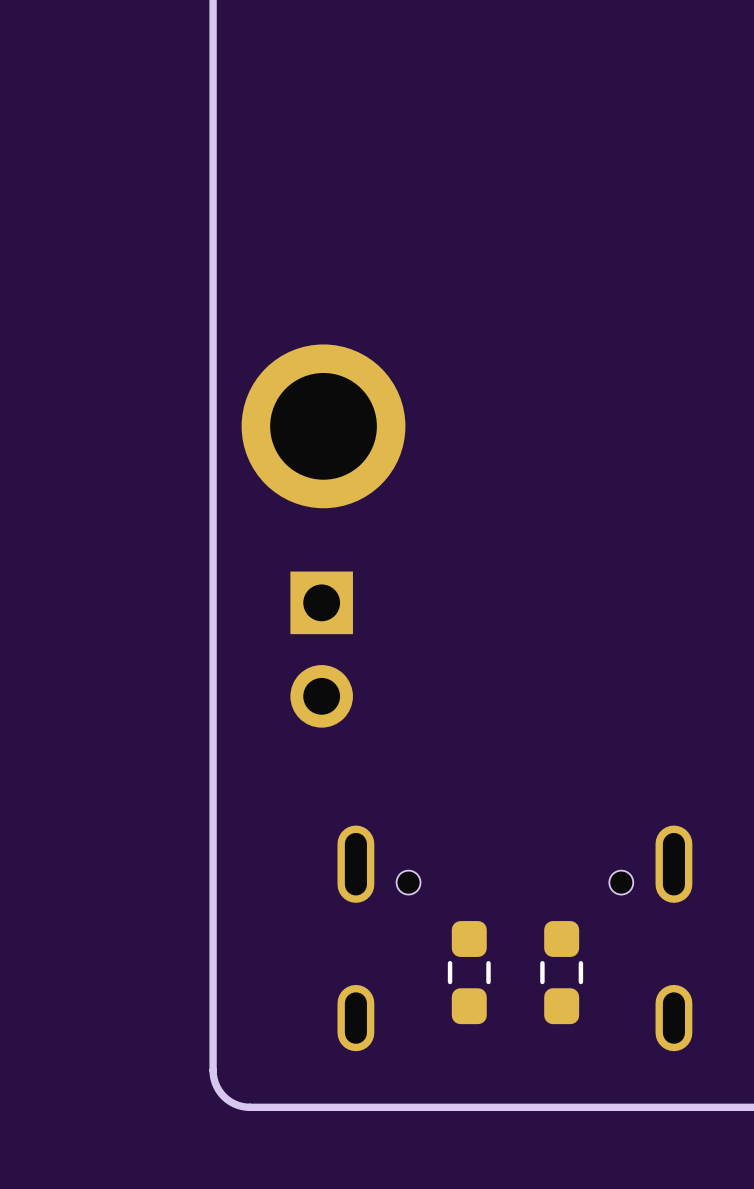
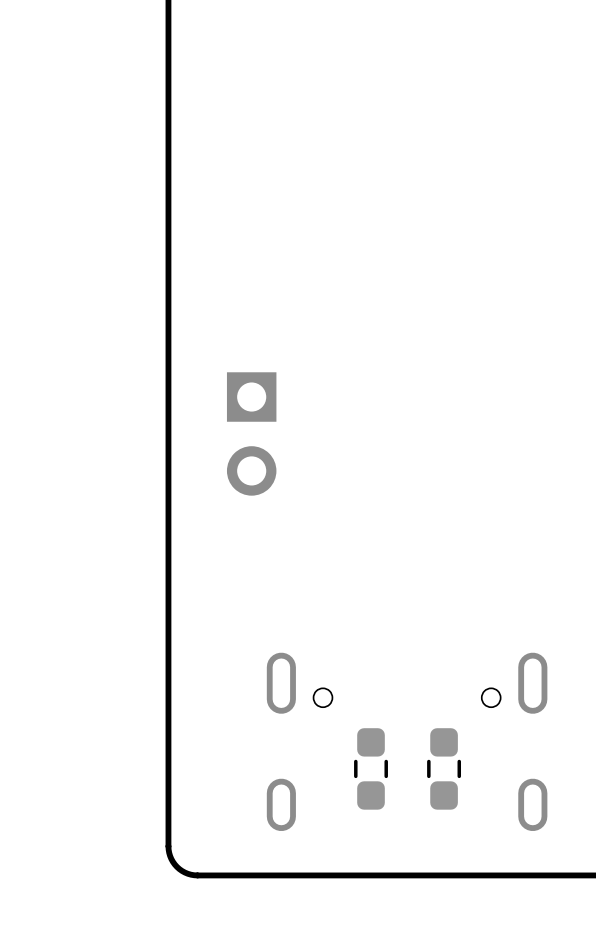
part: (323, 426) -> none
part position: (321, 649) -> (251, 433)

